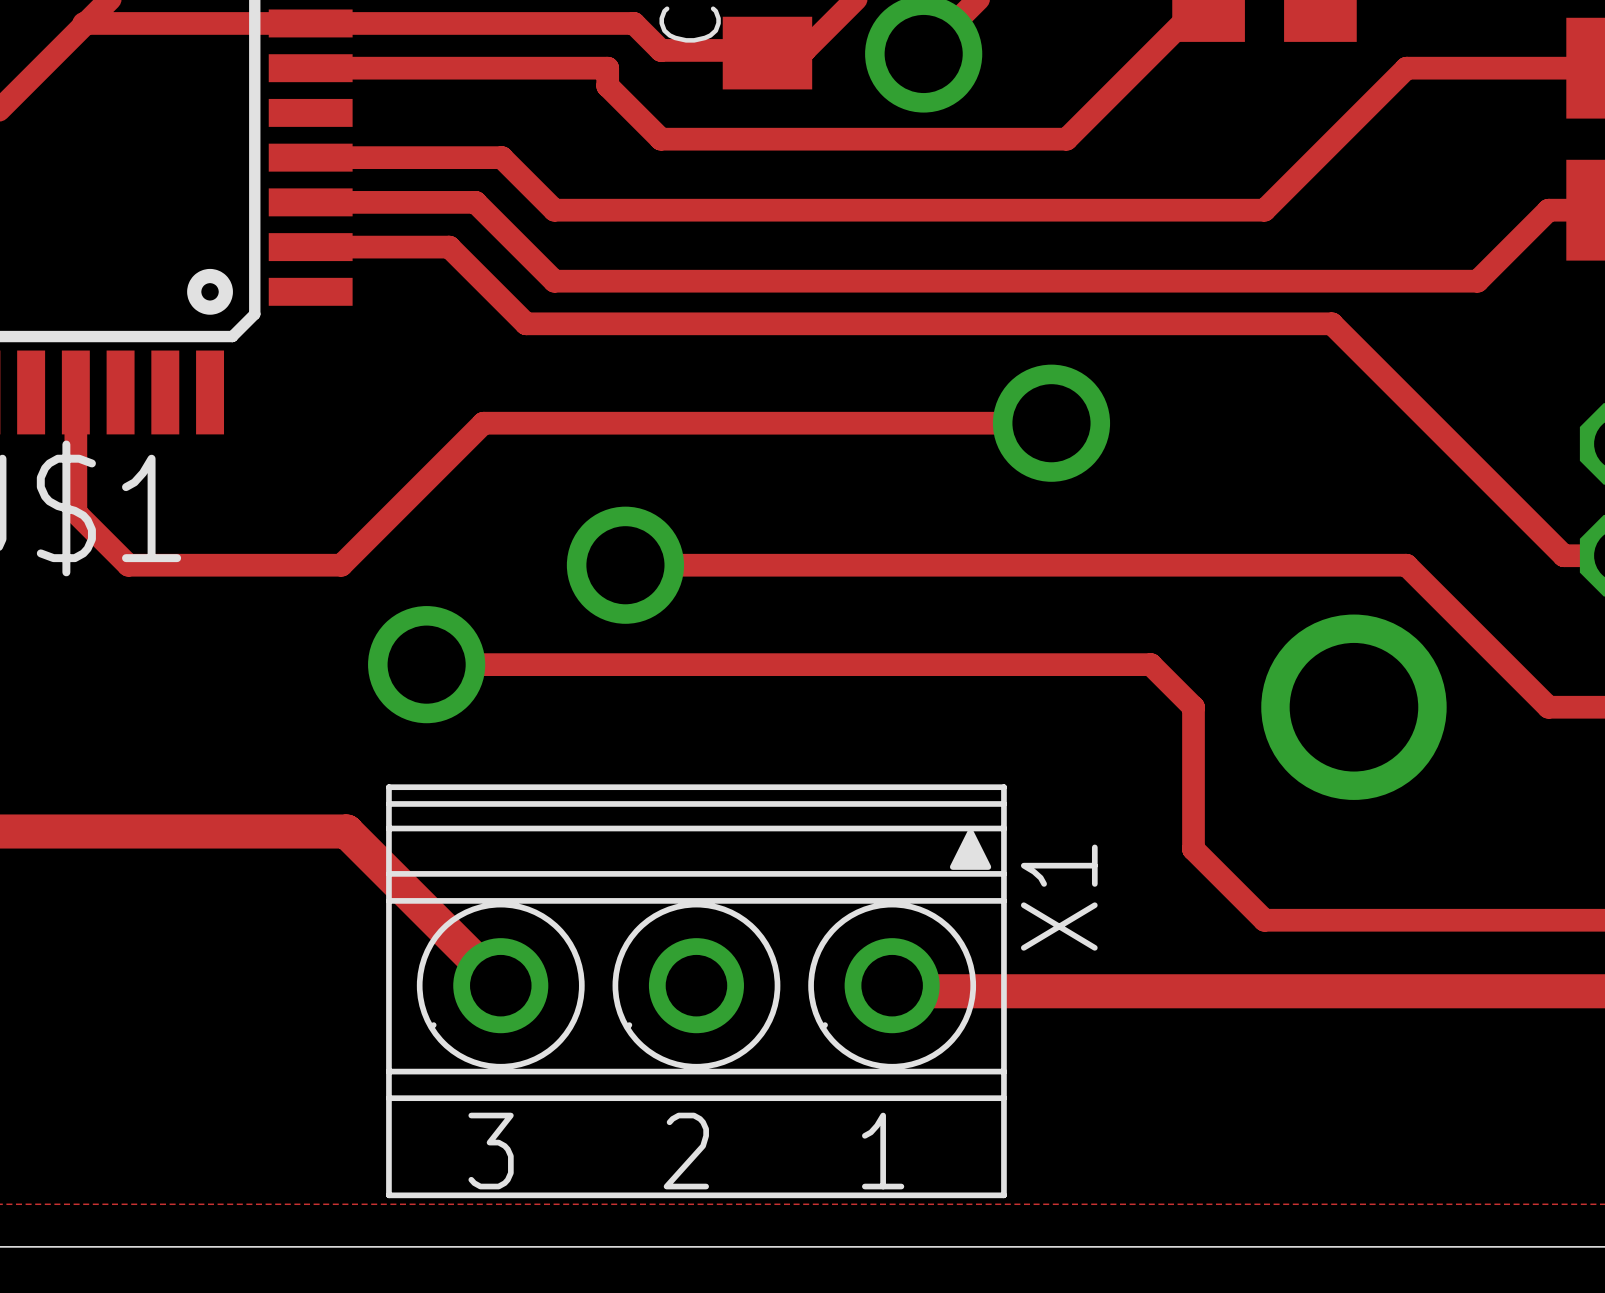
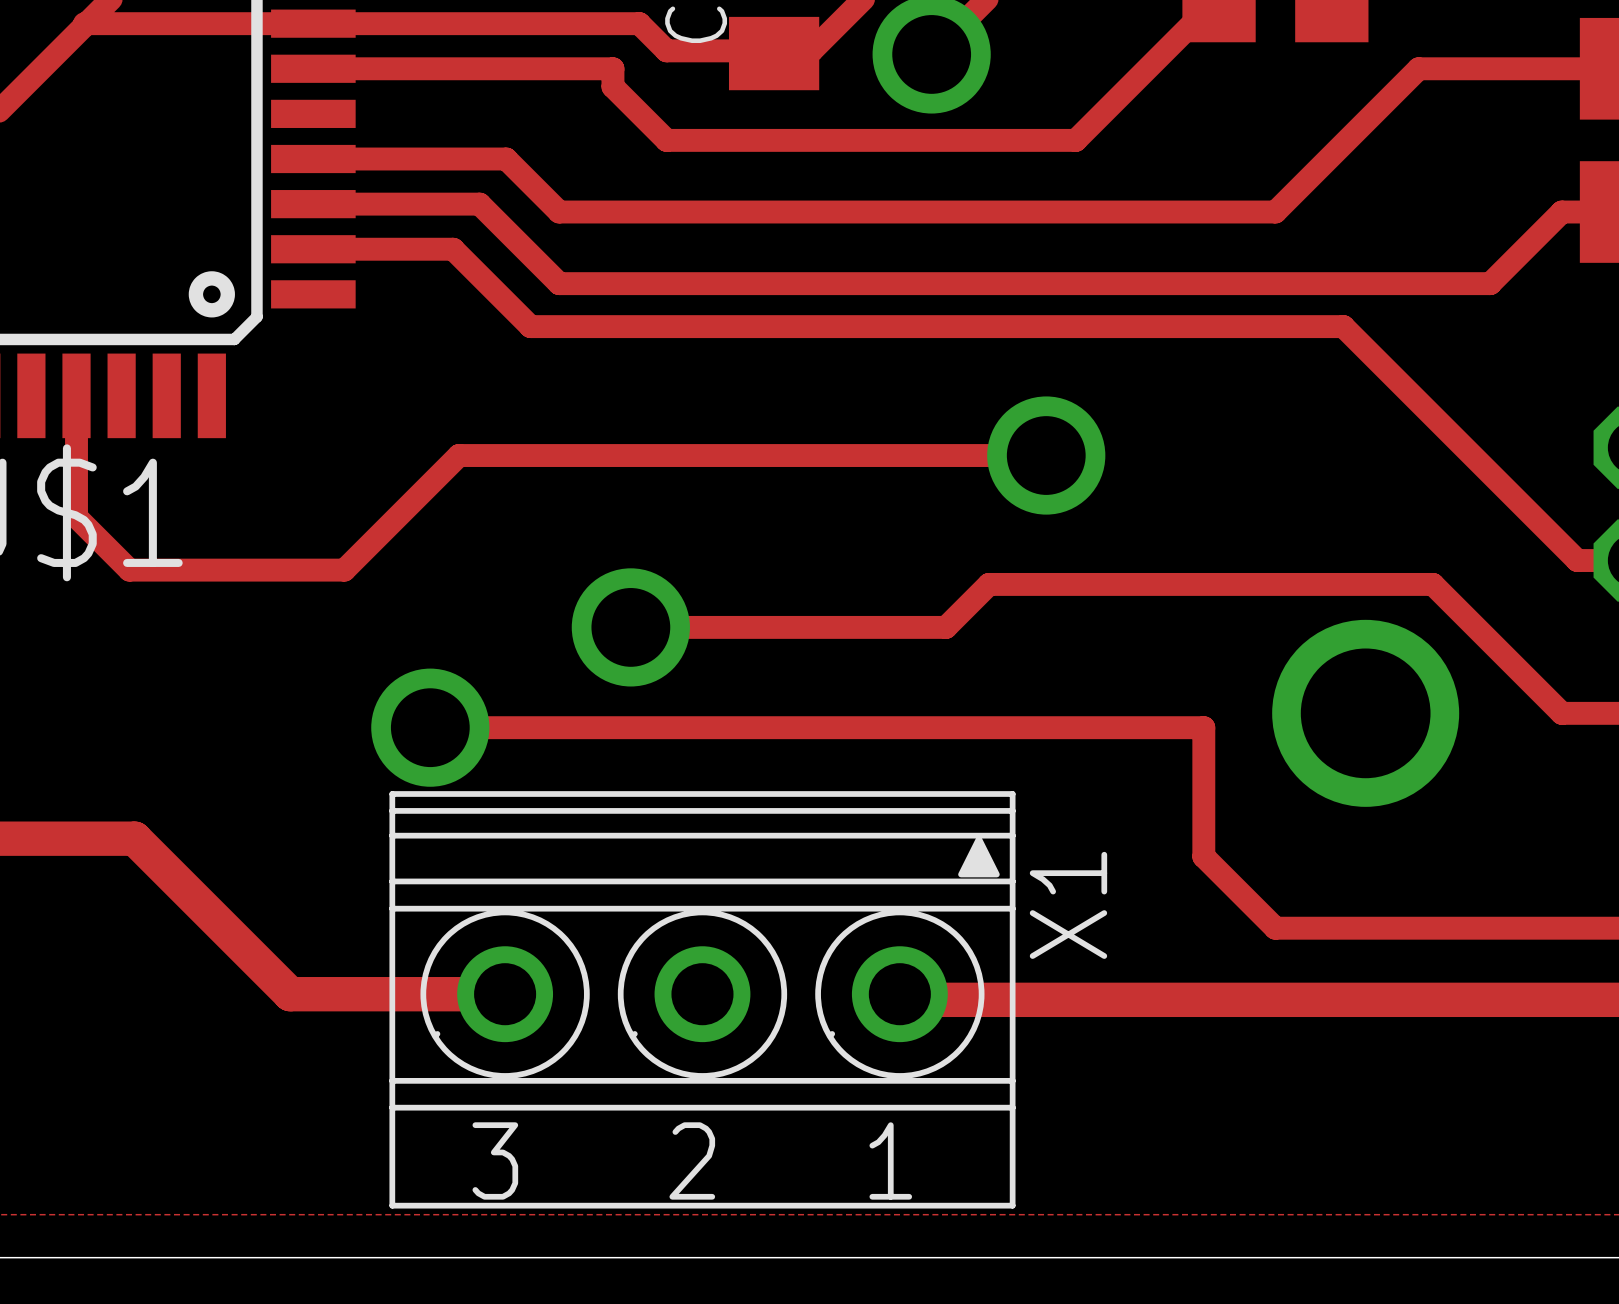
track: (1051, 423) (483, 423) (455, 451) -> (1046, 455) (458, 455)
via position: (1051, 423) -> (1046, 455)
track: (625, 565) (1406, 565) (1420, 579) -> (630, 627) (945, 627) (988, 584) (1433, 584)
via position: (625, 565) -> (630, 627)
track: (426, 664) (1150, 664) (1193, 707) (1193, 721) -> (430, 727) (1203, 727)
via position: (426, 664) -> (430, 727)
track: (133, 831) (346, 831) (500, 985) -> (134, 838) (290, 994) (505, 994)

